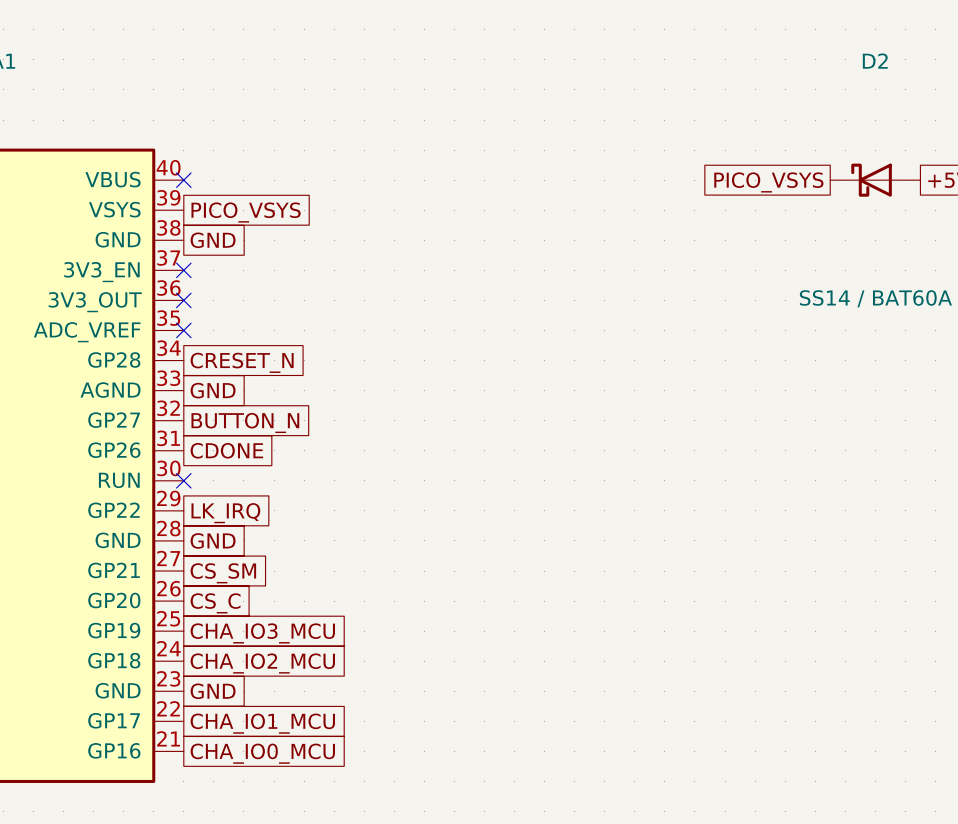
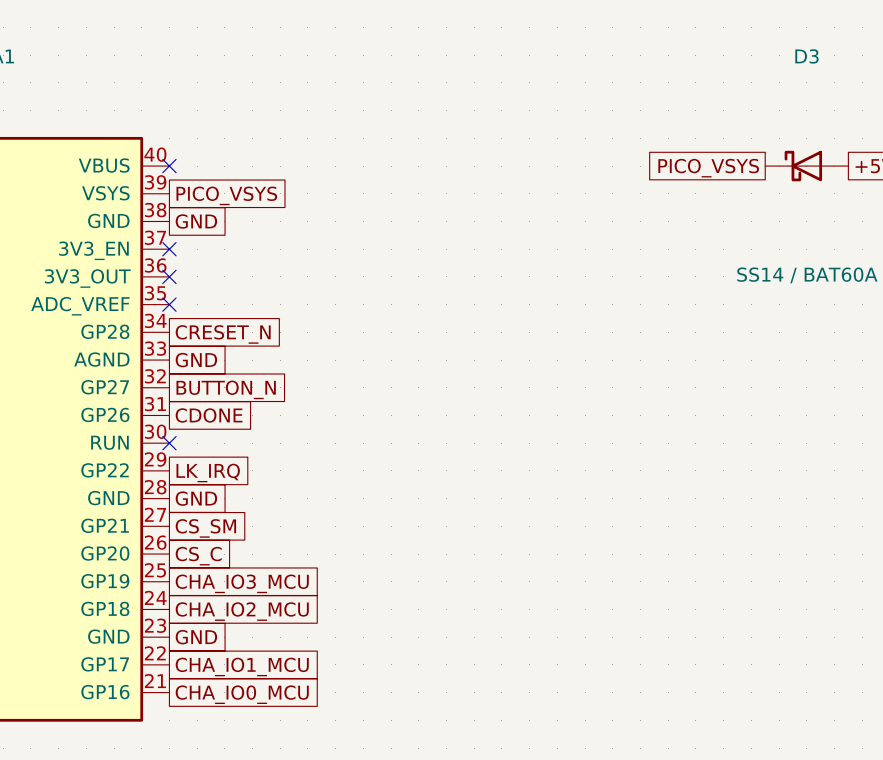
D2 name: D2 (875, 61) -> D3 (806, 56)

